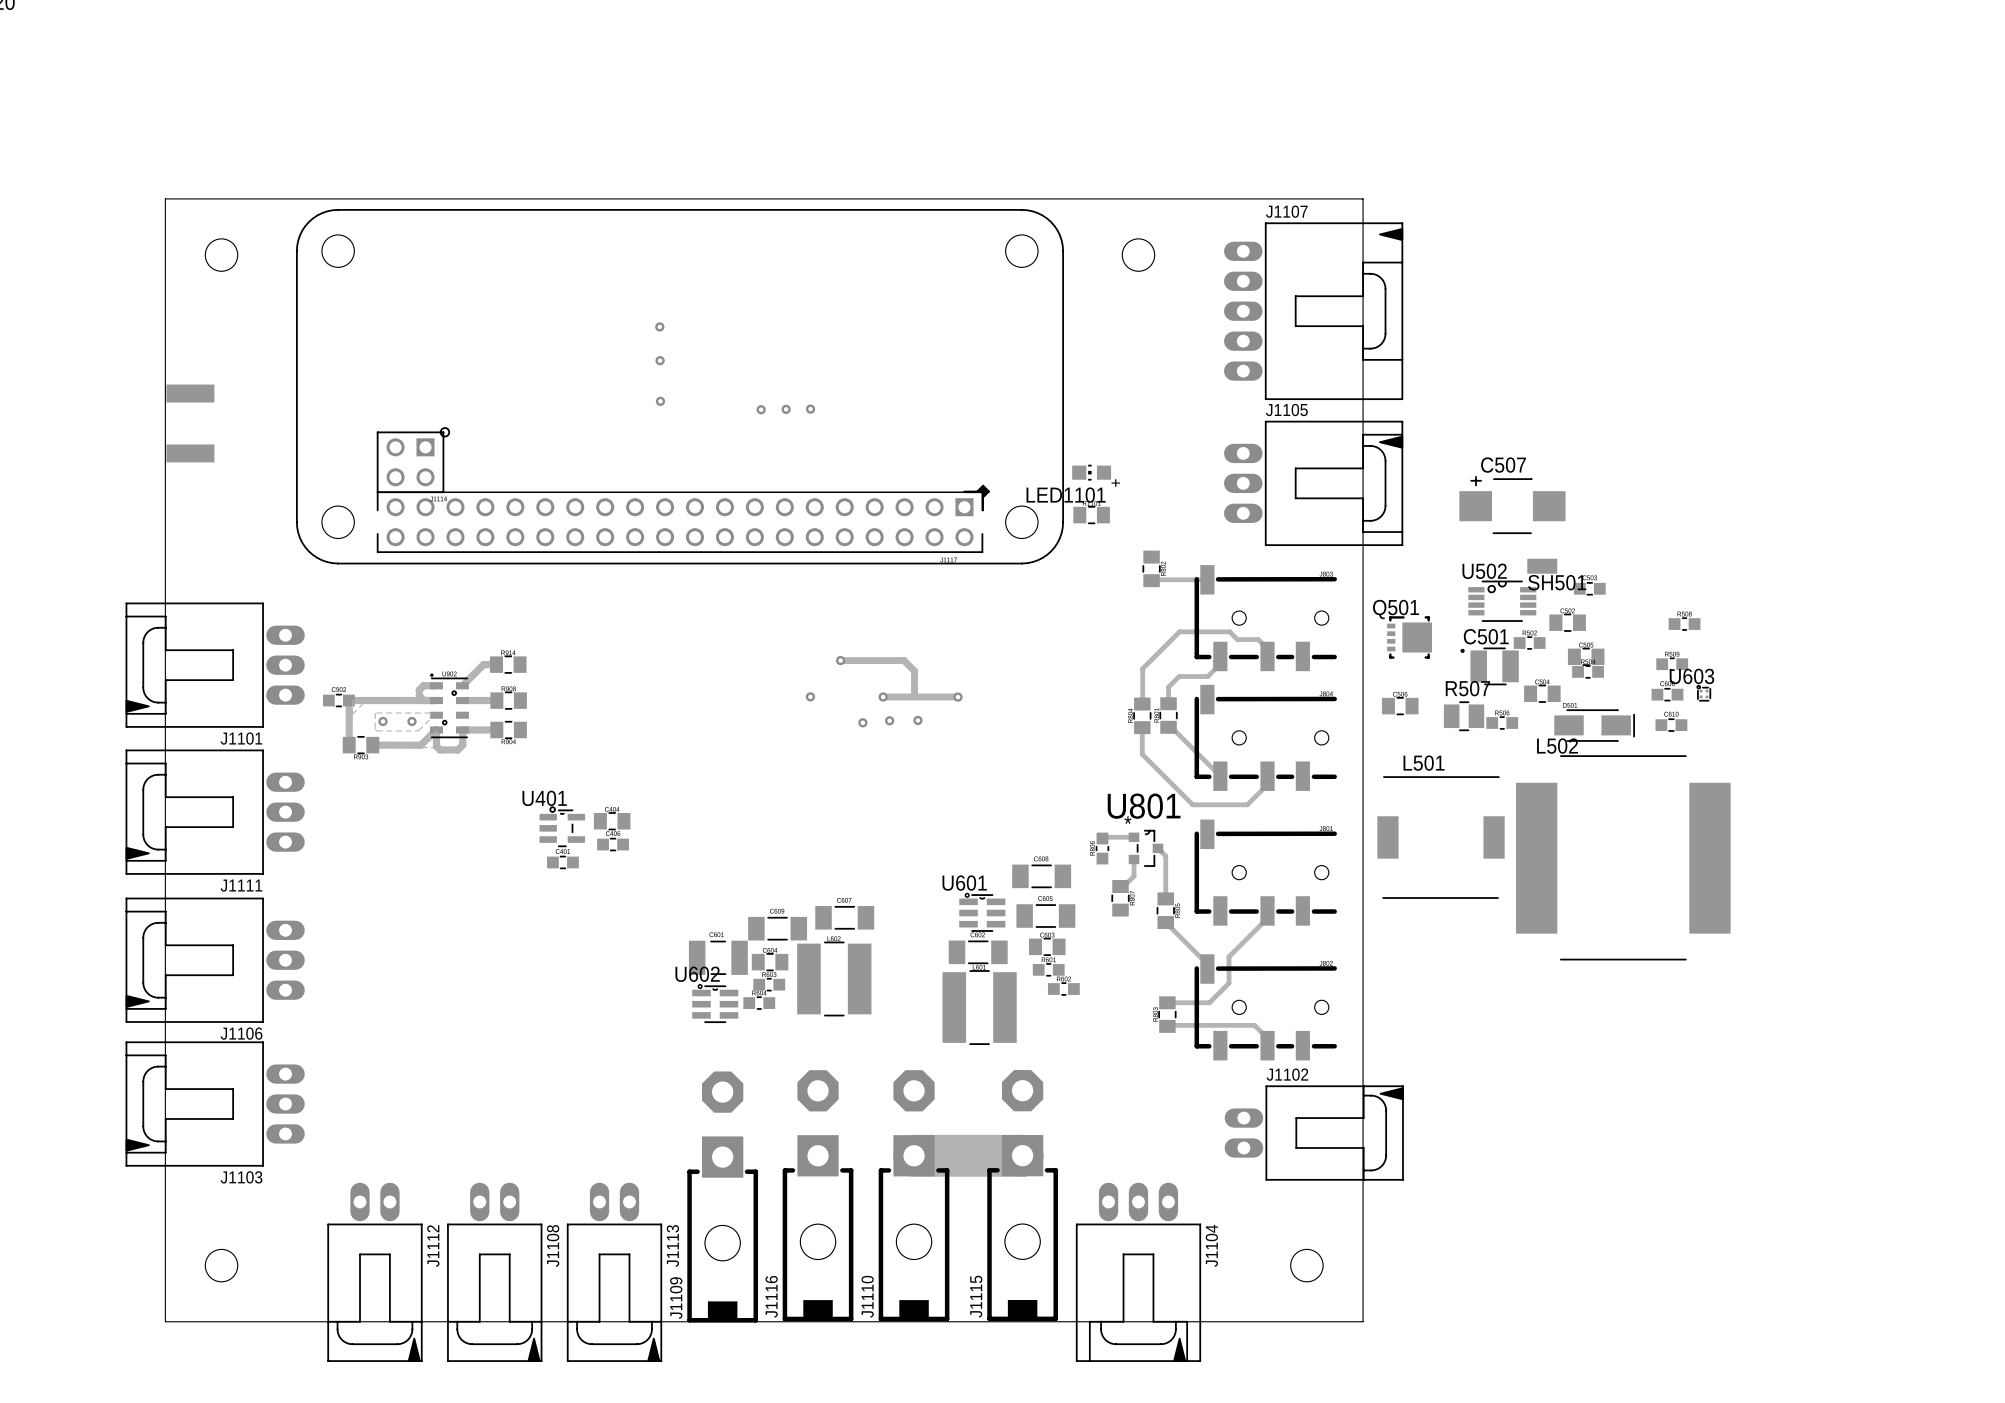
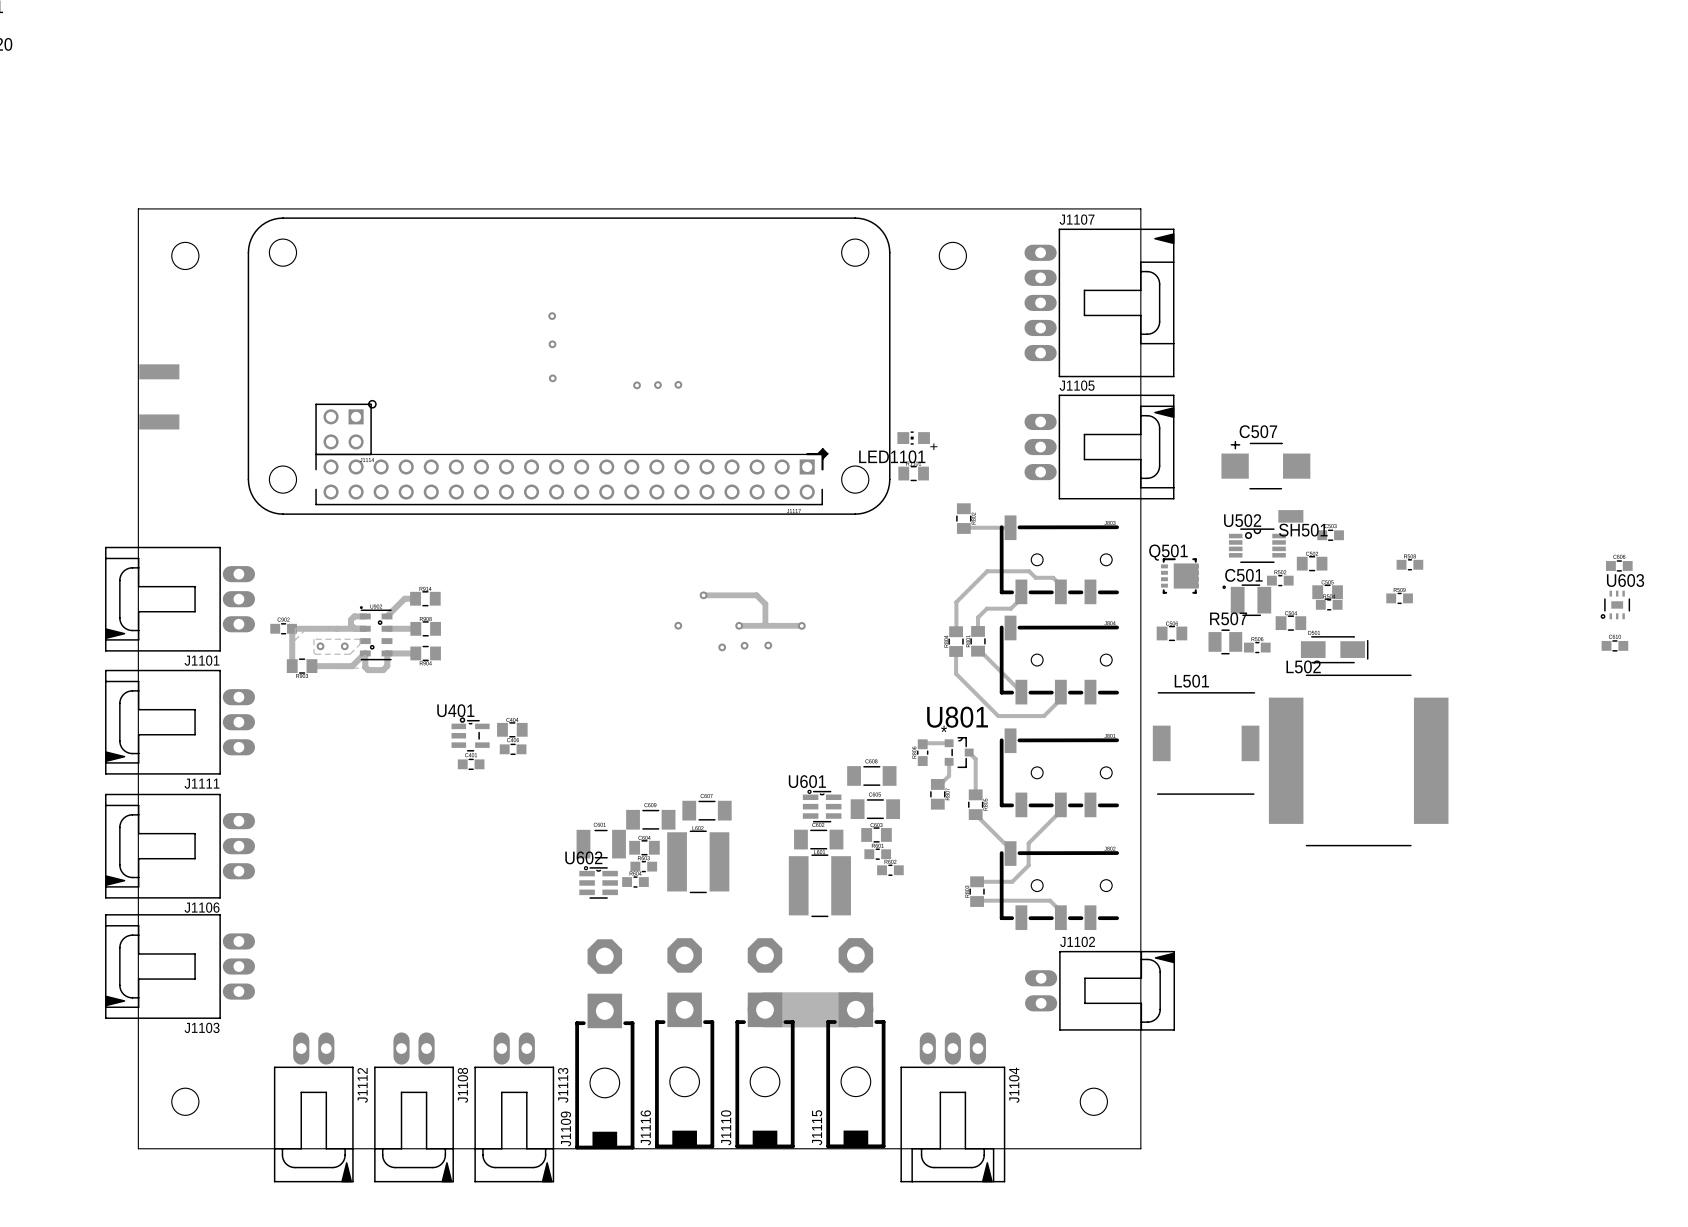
U603 name position: U603 (1691, 676) -> U603 (1625, 580)
U603 footprint: [1696, 684, 1712, 702] -> [1600, 590, 1631, 620]
part position: (1667, 694) -> (1619, 565)
part position: (1671, 725) -> (1614, 645)

